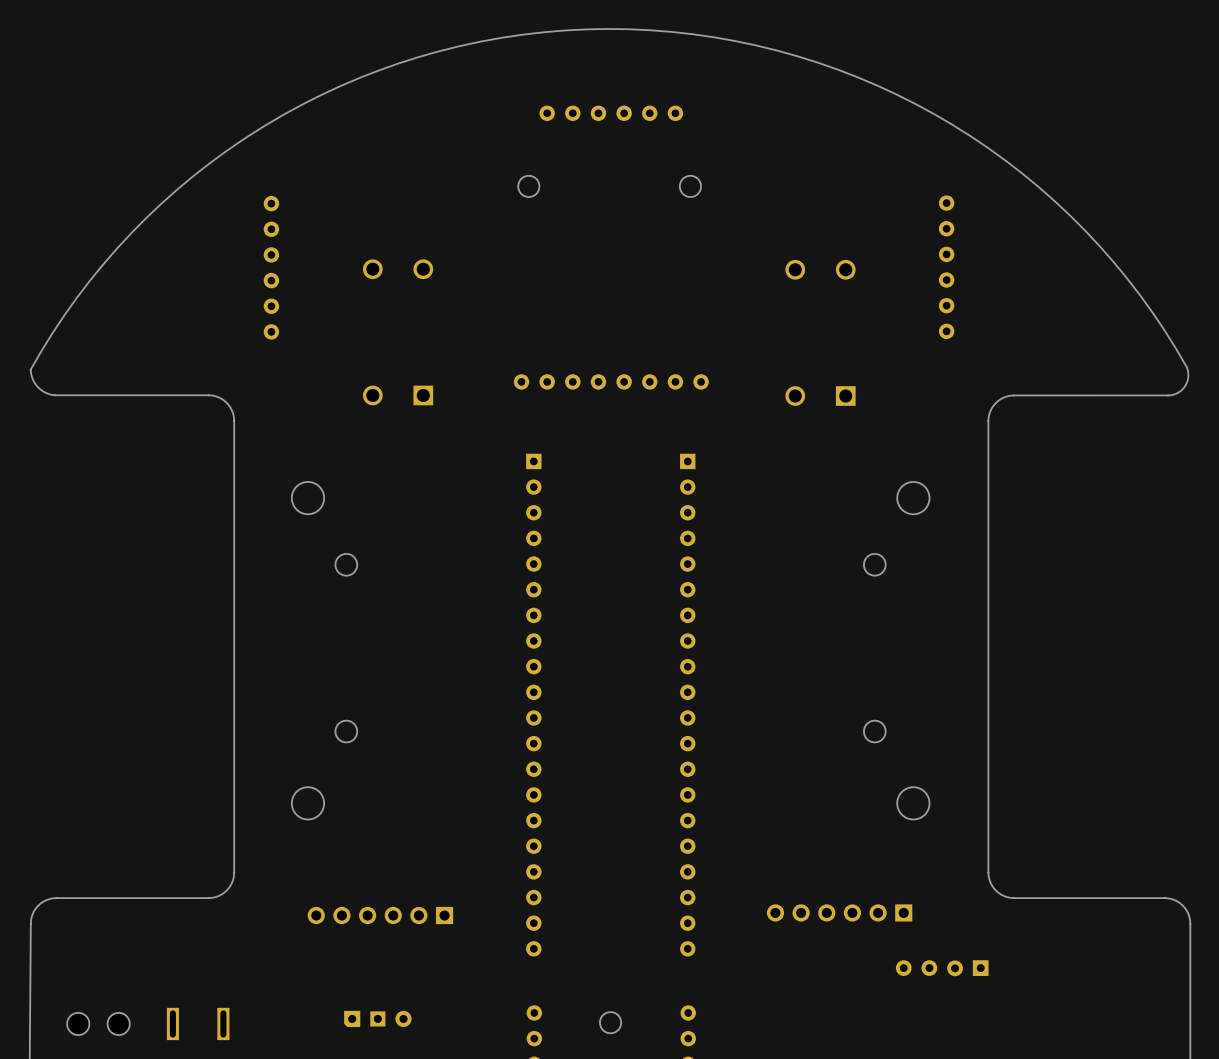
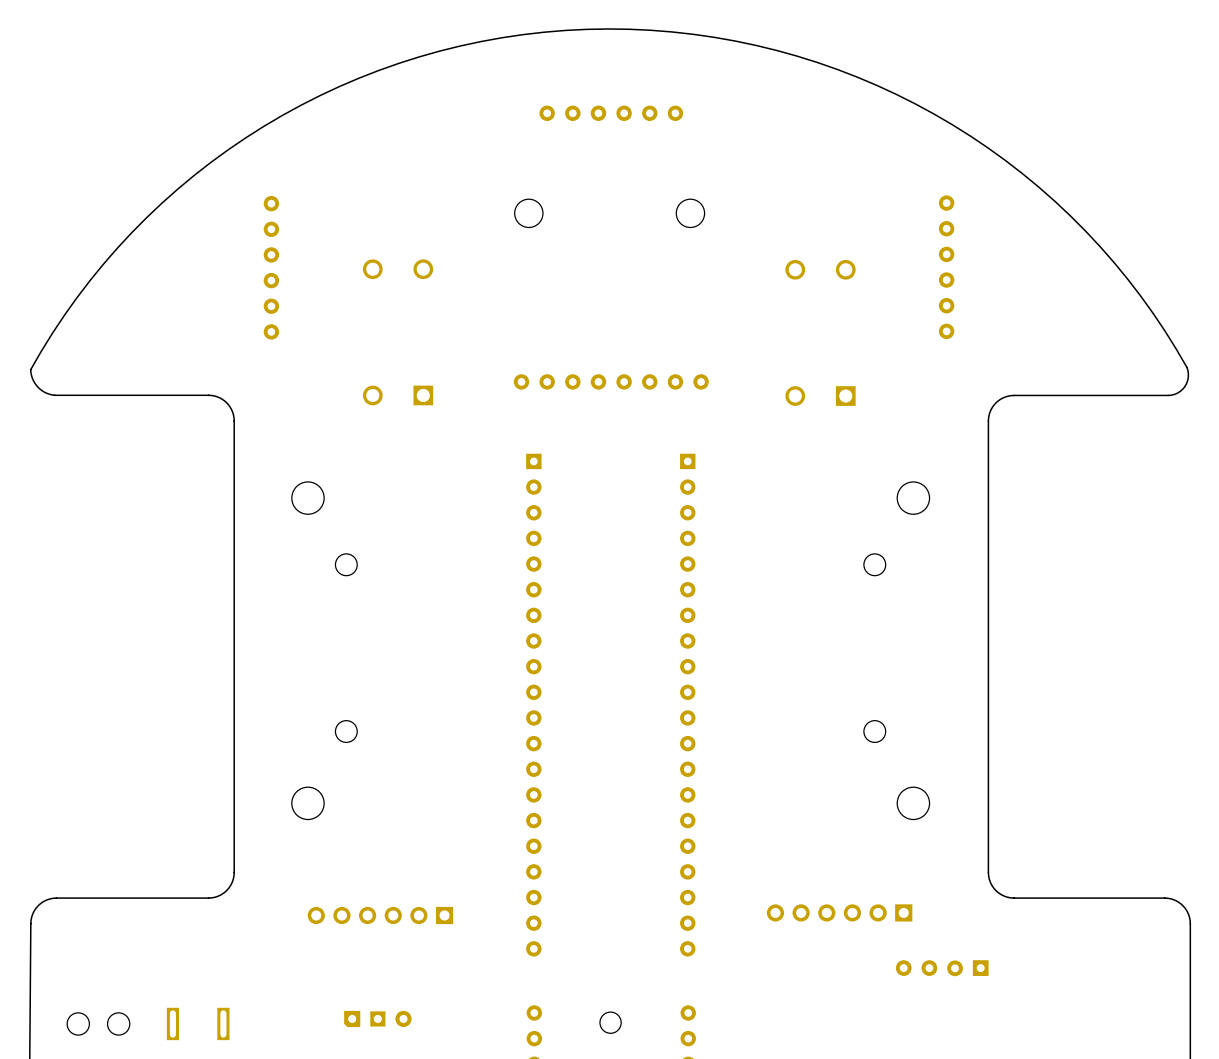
round board edge: [517, 175, 540, 198] -> none
round board edge: [679, 175, 702, 198] -> none
round board edge: none -> [514, 198, 544, 228]
round board edge: none -> [676, 198, 705, 228]

